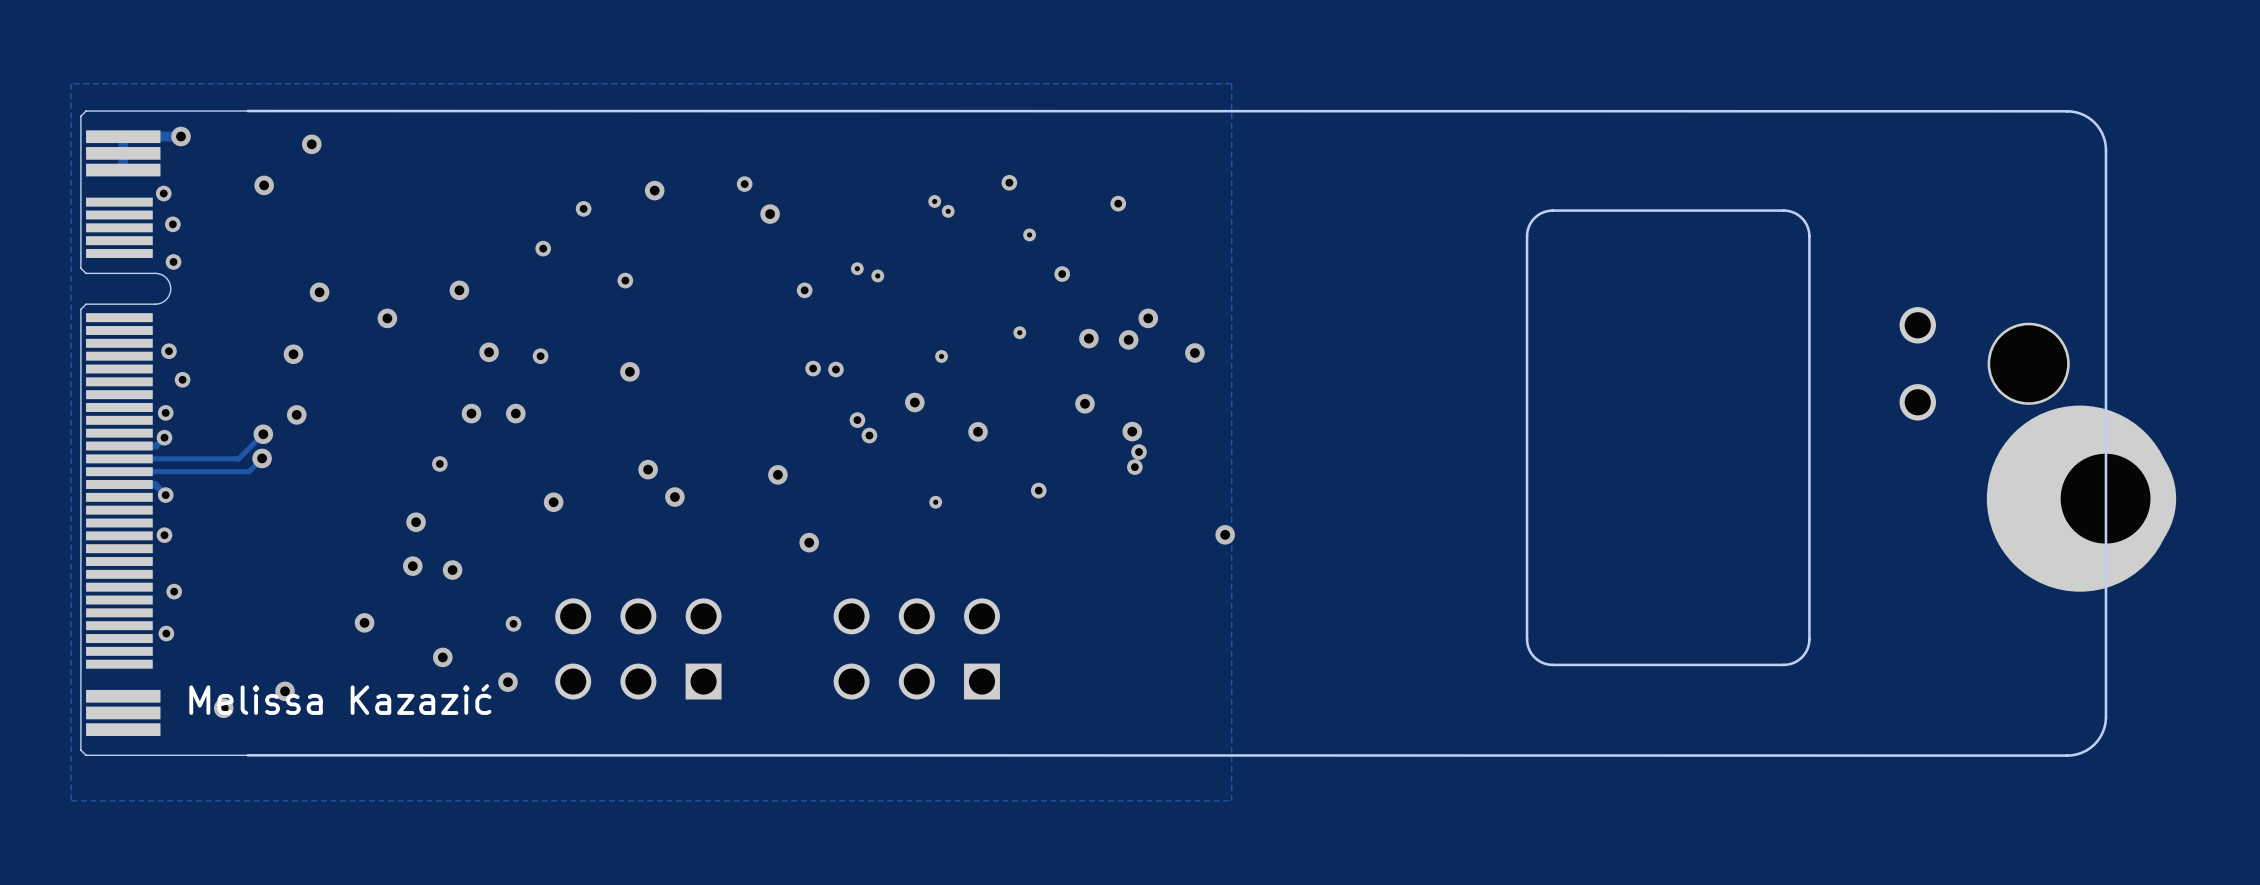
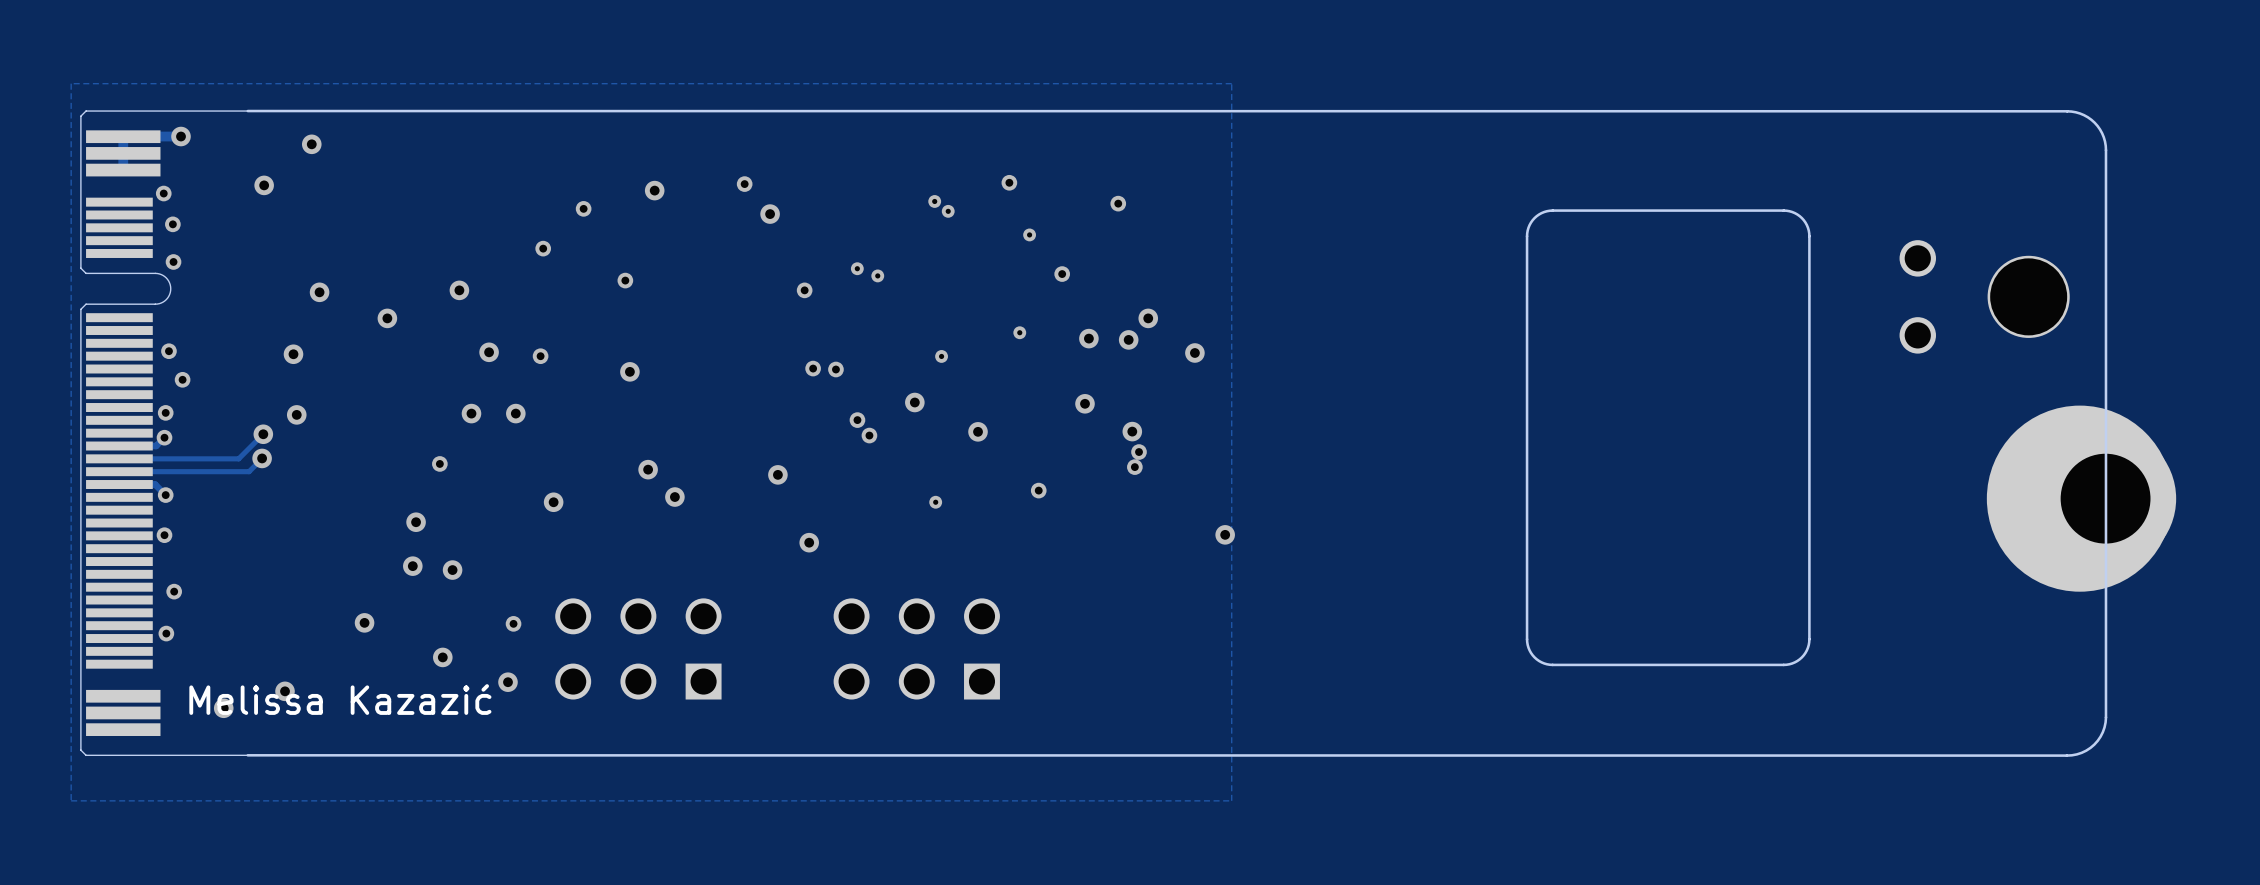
part position: (1984, 363) -> (1984, 296)

